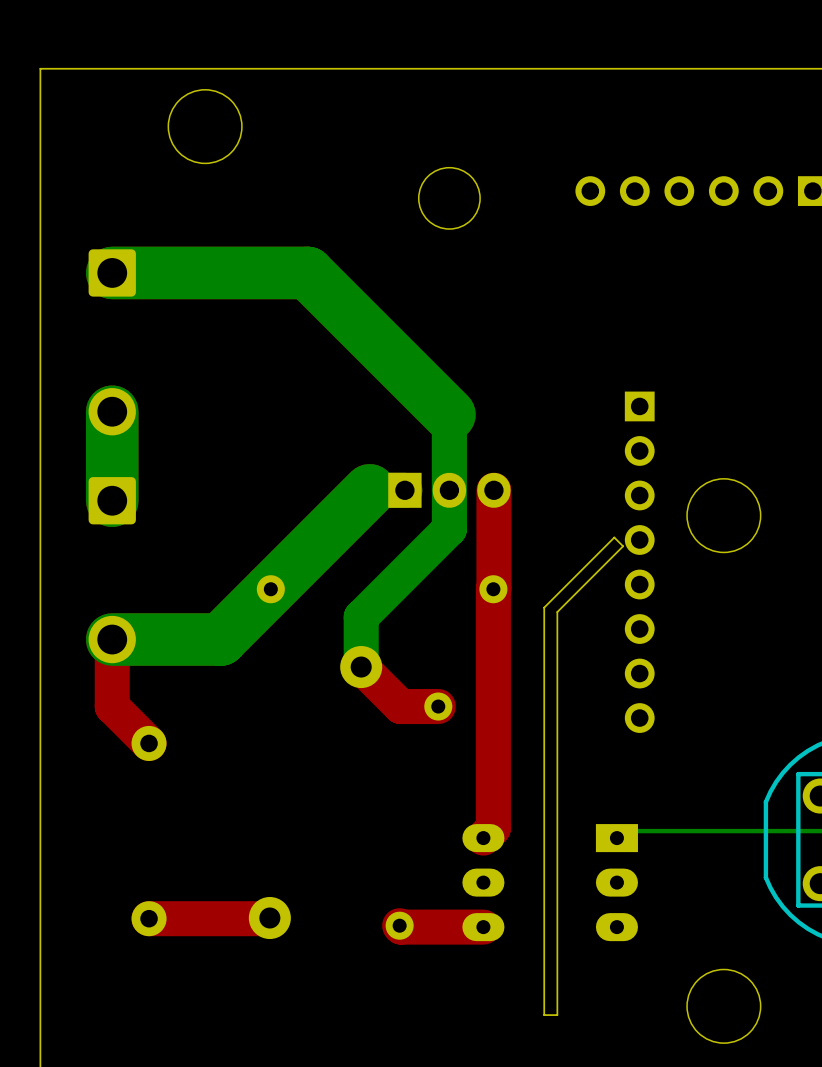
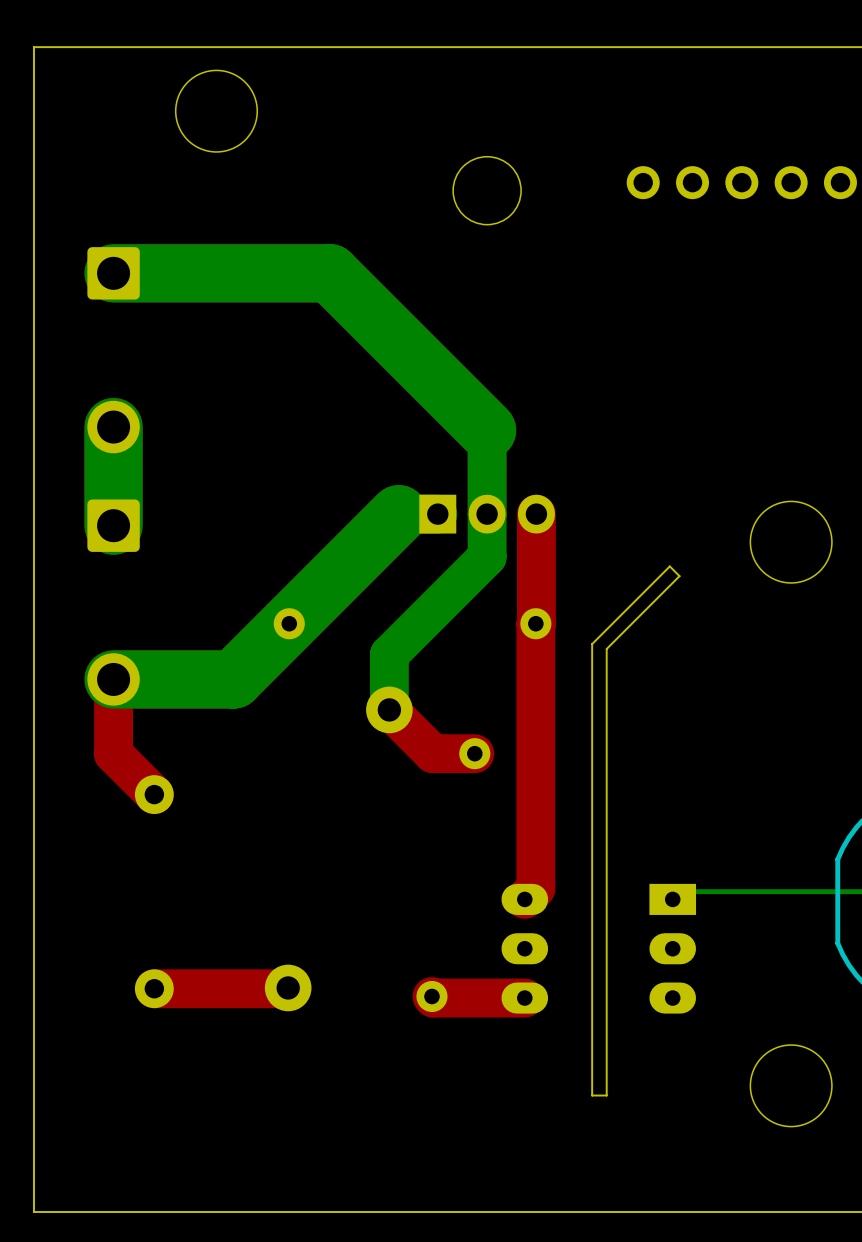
part: (639, 562) -> none

